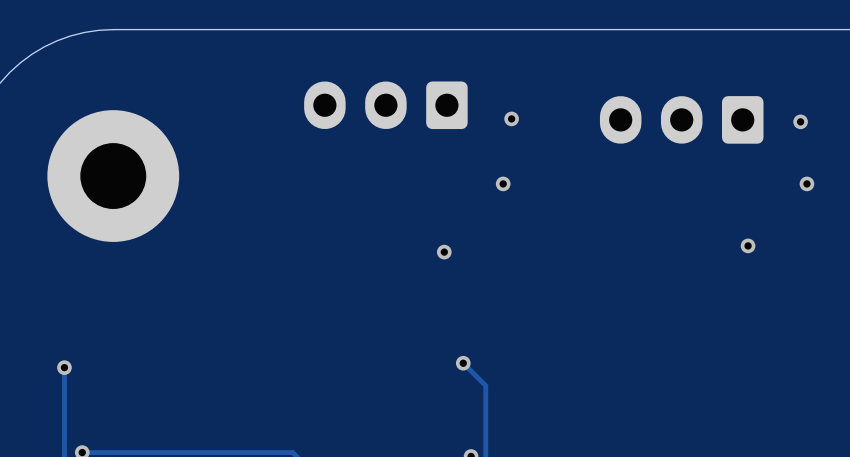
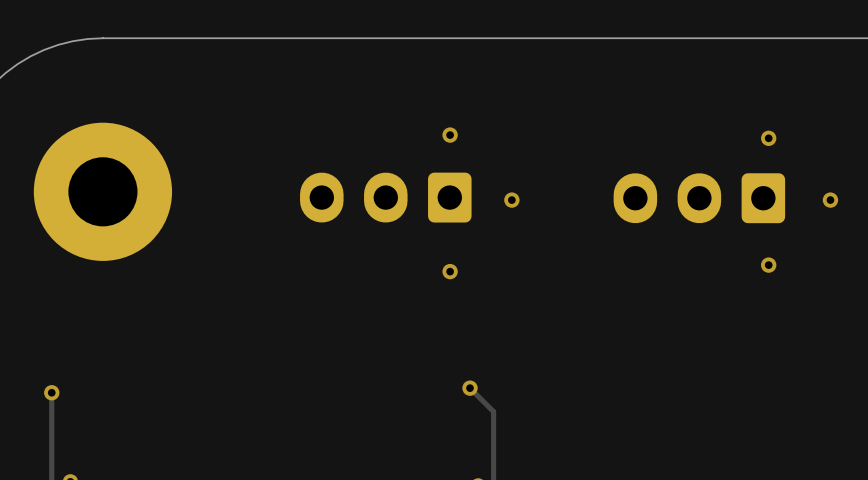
part position: (385, 105) -> (385, 197)
via position: (511, 118) -> (450, 135)
part position: (681, 119) -> (699, 198)
via position: (800, 121) -> (768, 138)

